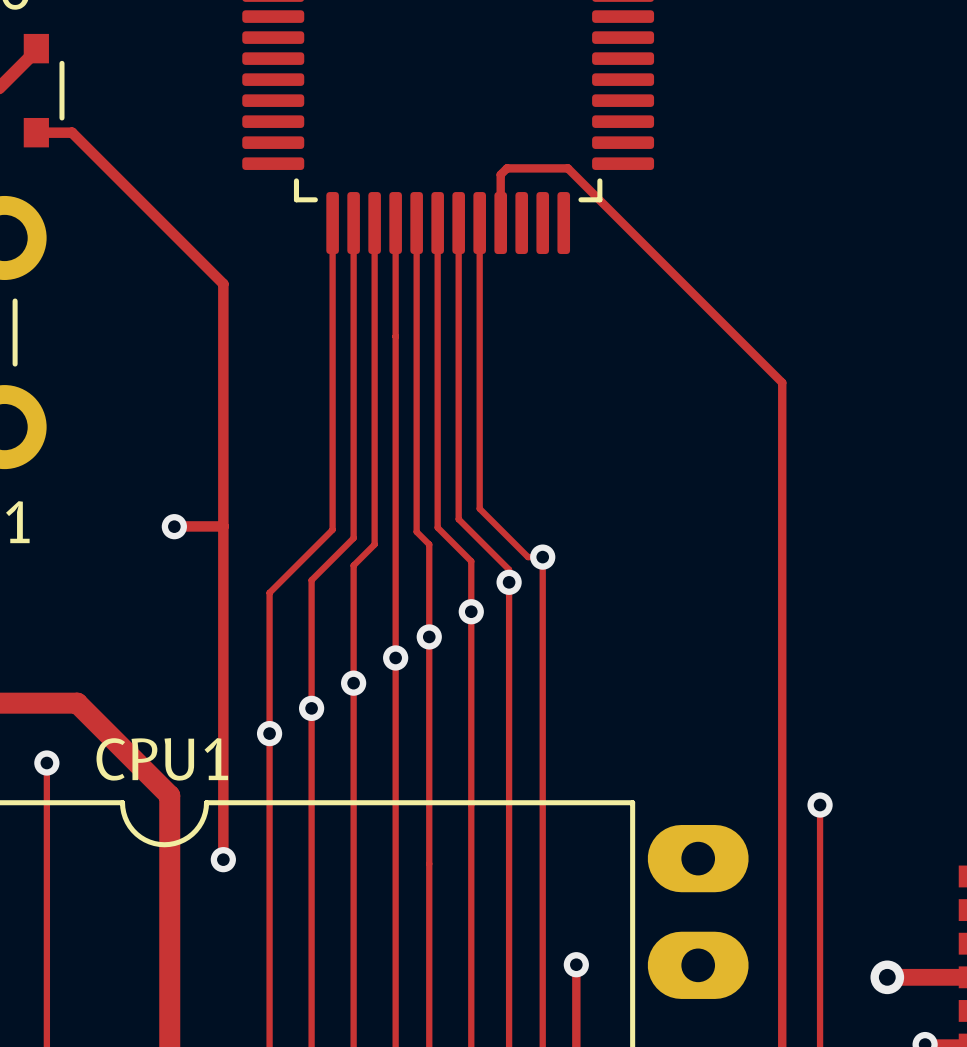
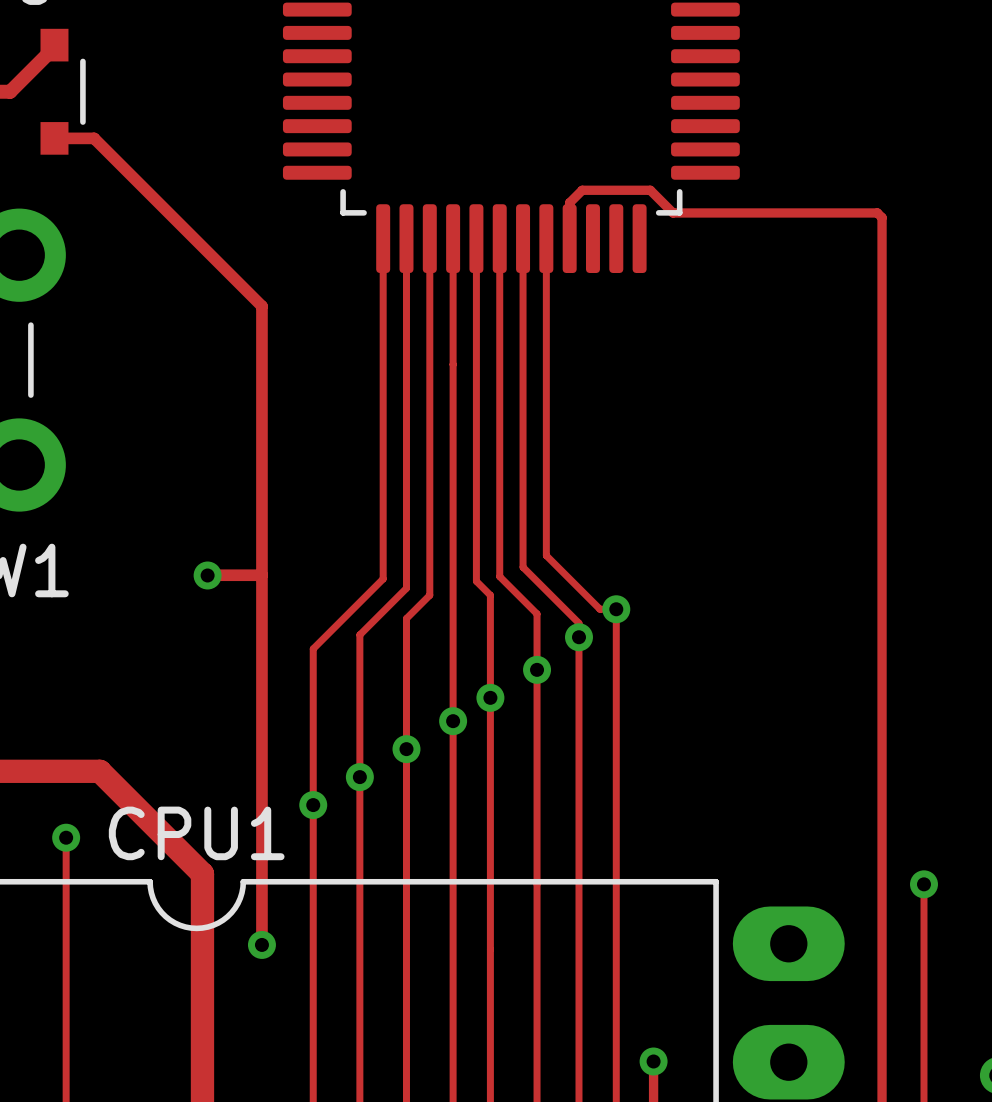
track: (500, 190) (500, 174) (507, 168) (567, 168) (782, 382) -> (569, 202) (582, 190) (650, 190) (673, 212) (877, 212) (882, 217) (882, 415)

